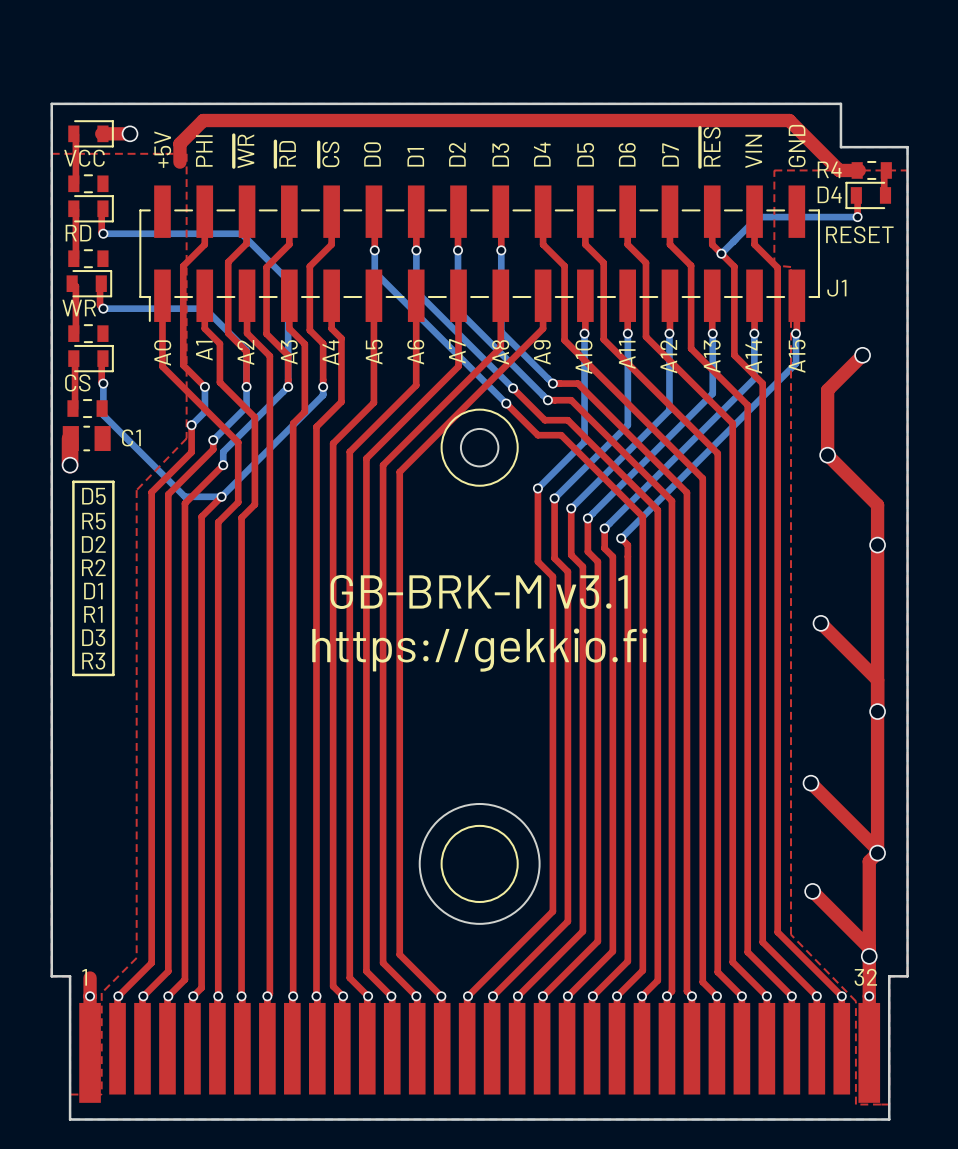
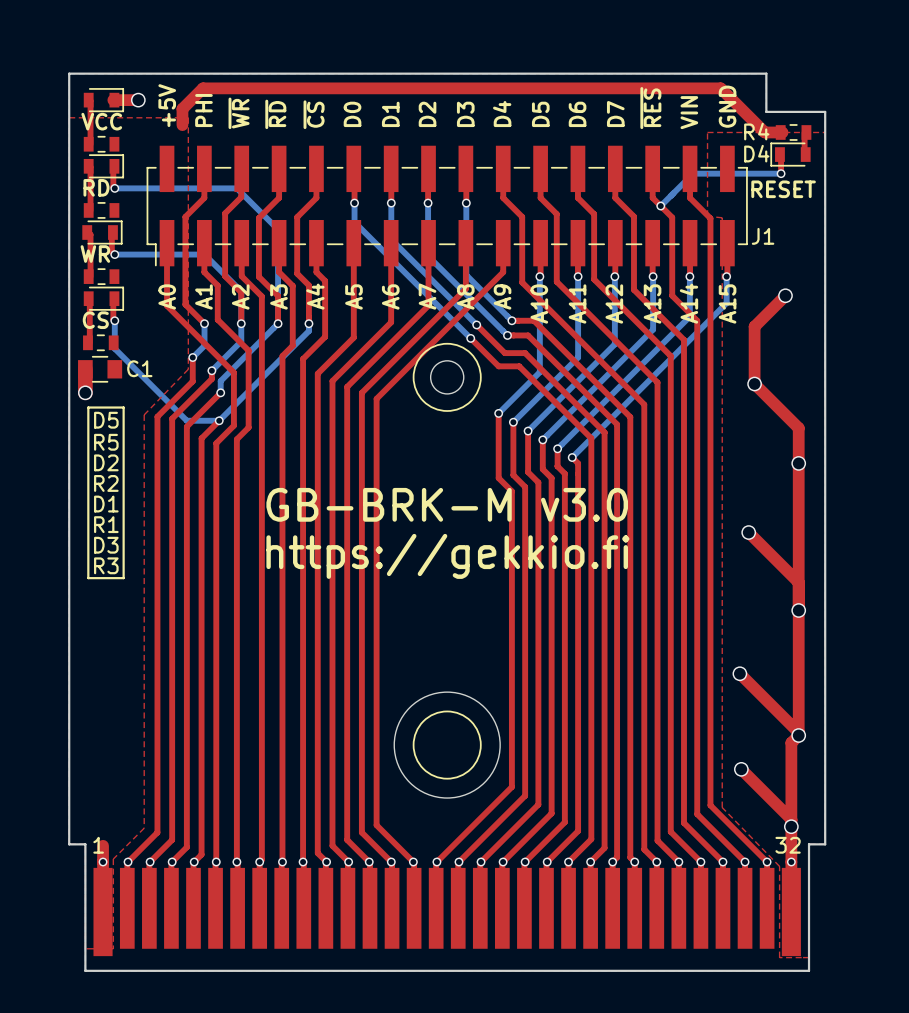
C1 footprint: [62, 425, 111, 452] -> [78, 355, 123, 383]
text: GB-BRK-M v3.1 (479, 591) -> GB-BRK-M v3.0 (447, 504)

